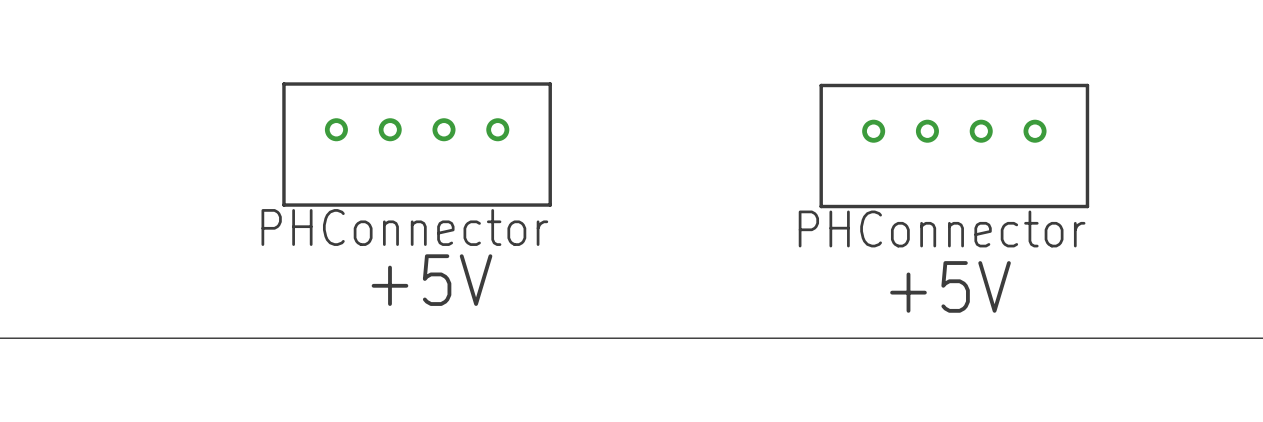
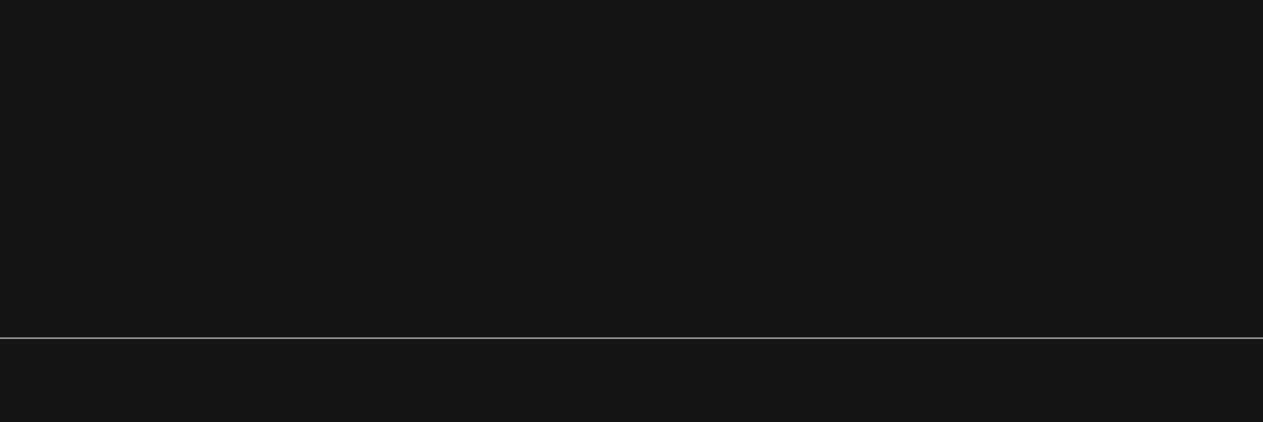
part: (417, 144) -> none
part: (954, 146) -> none
text: +5V (432, 280) -> none
text: +5V (950, 286) -> none

